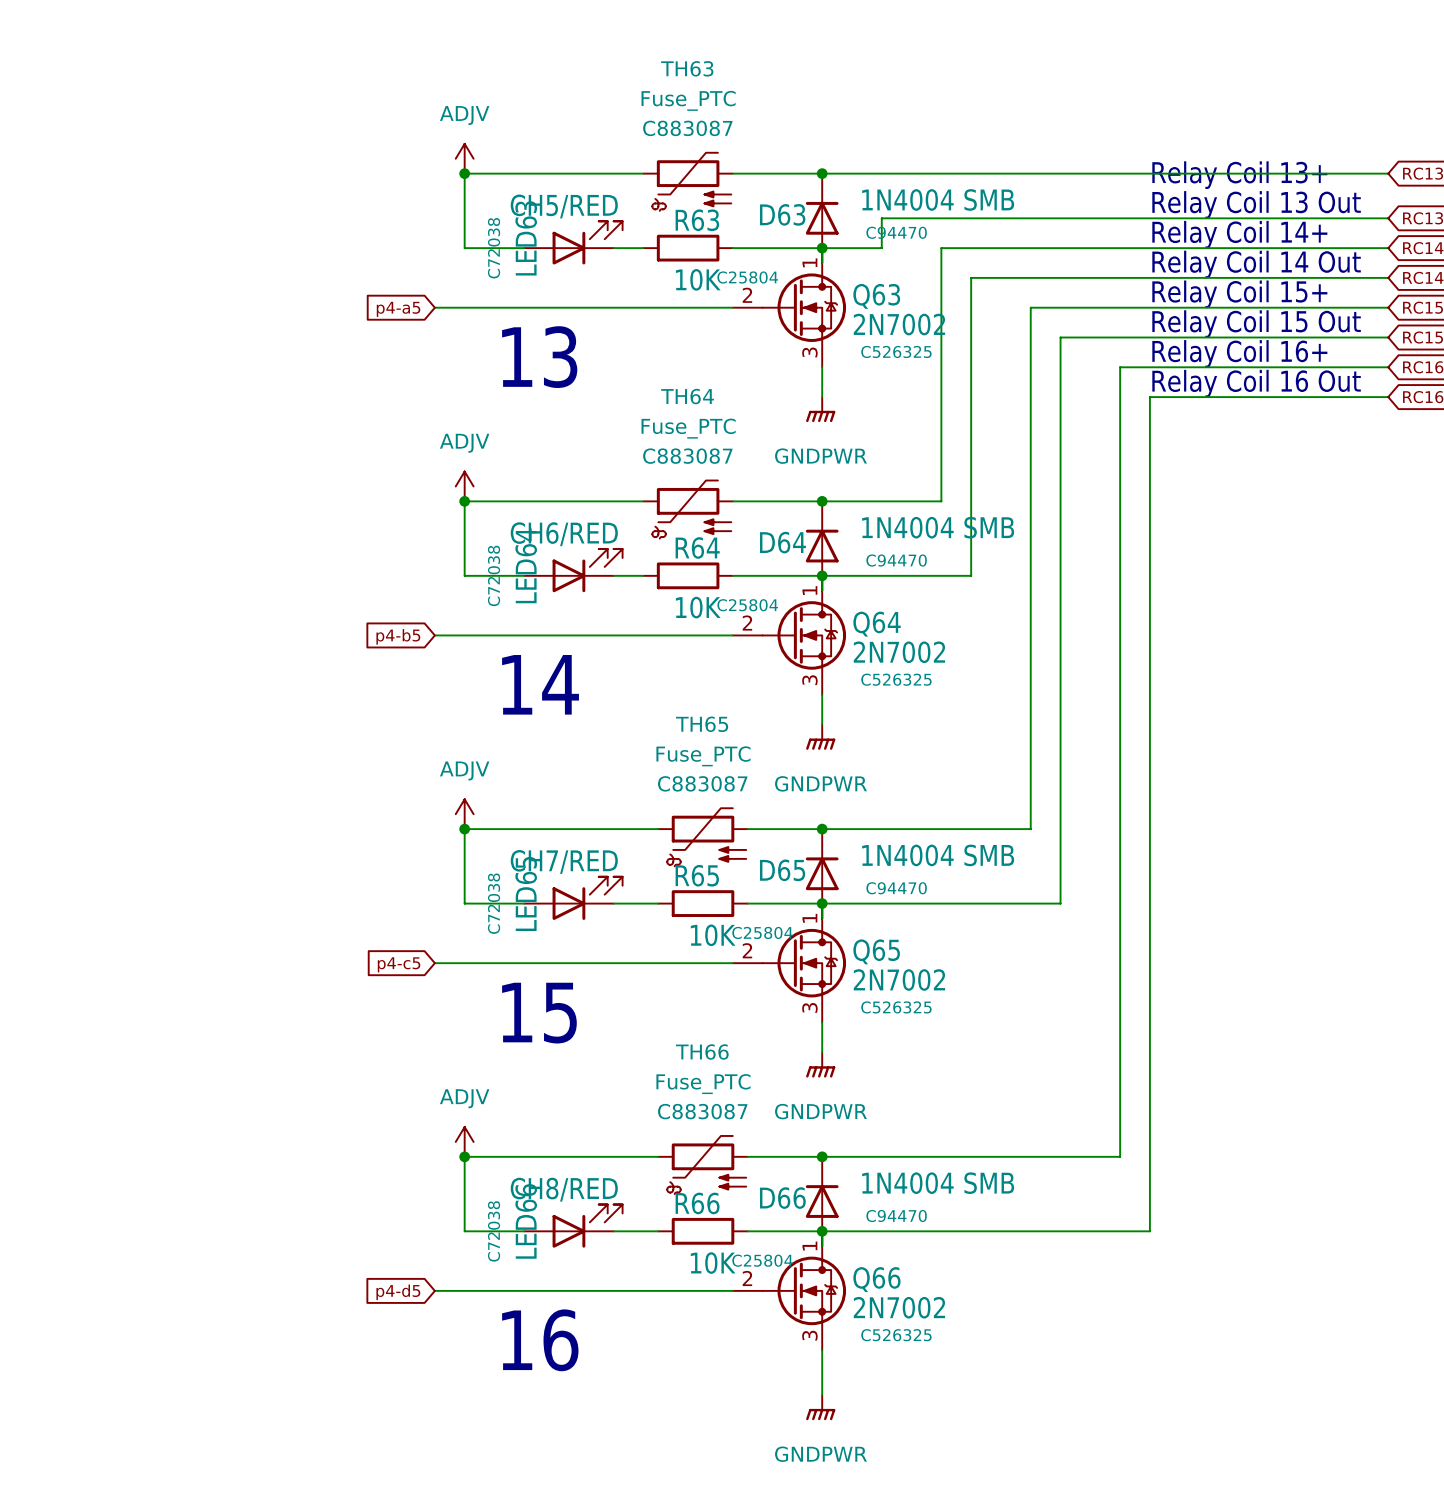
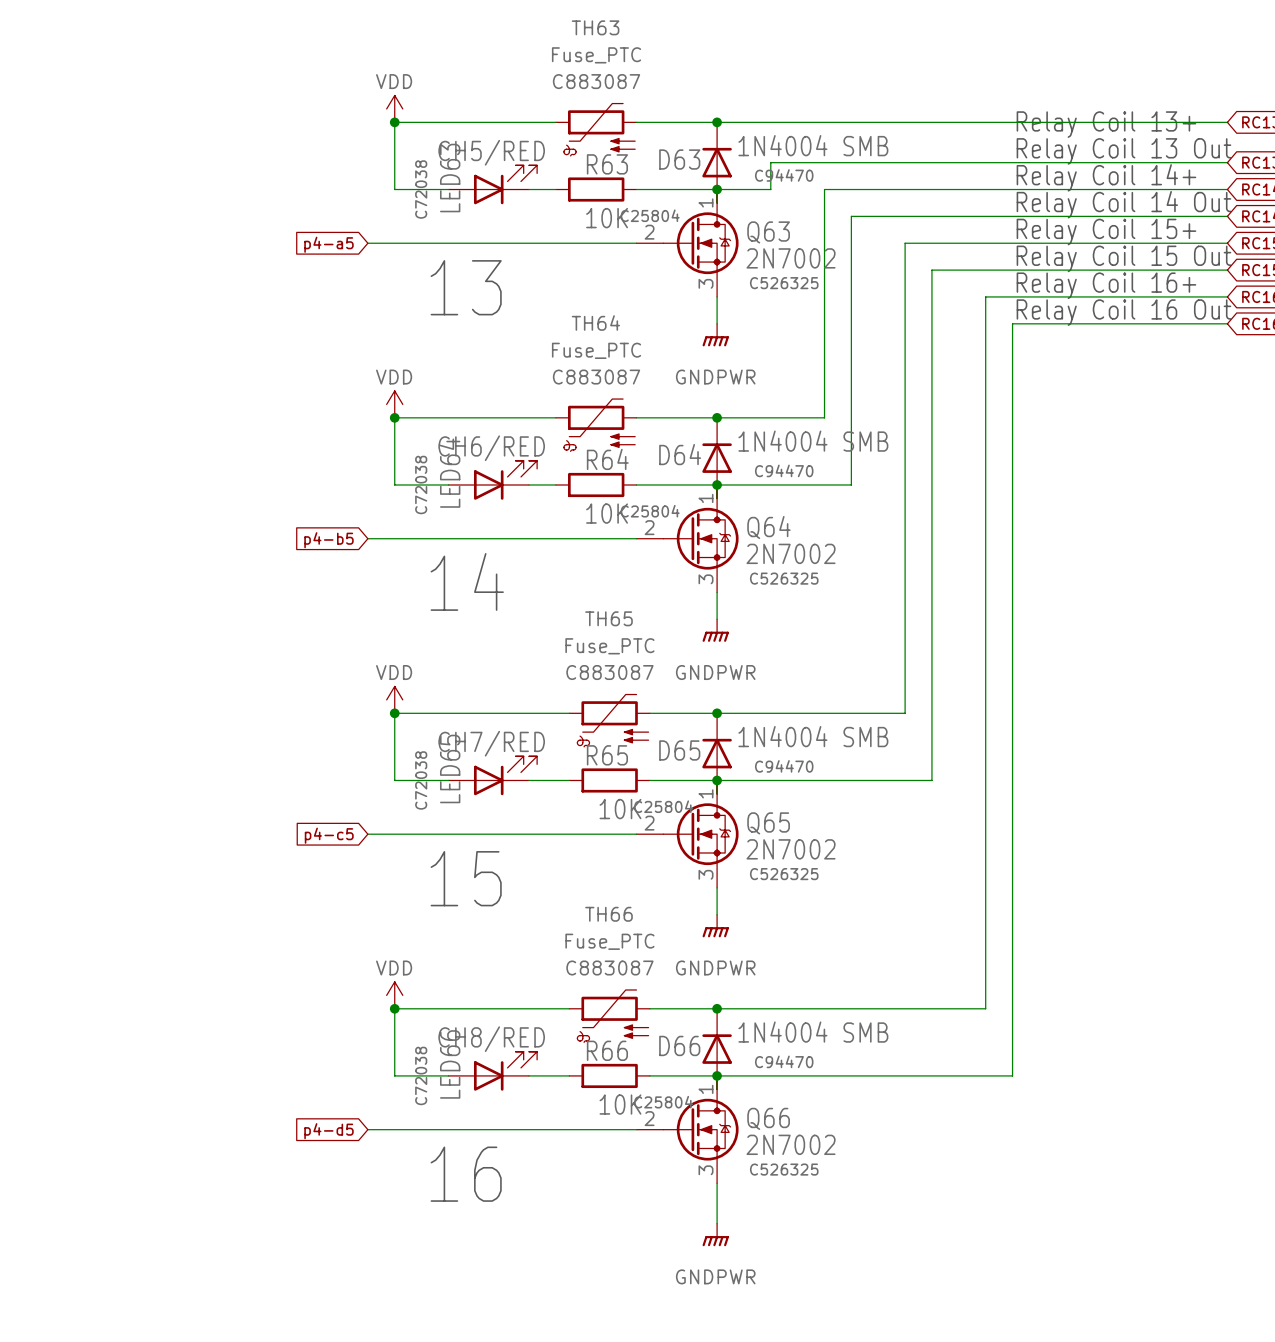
power symbol: ADJV (464, 158) -> VDD (394, 108)
power symbol: ADJV (464, 486) -> VDD (394, 404)
power symbol: ADJV (464, 814) -> VDD (394, 699)
power symbol: ADJV (464, 1141) -> VDD (394, 995)

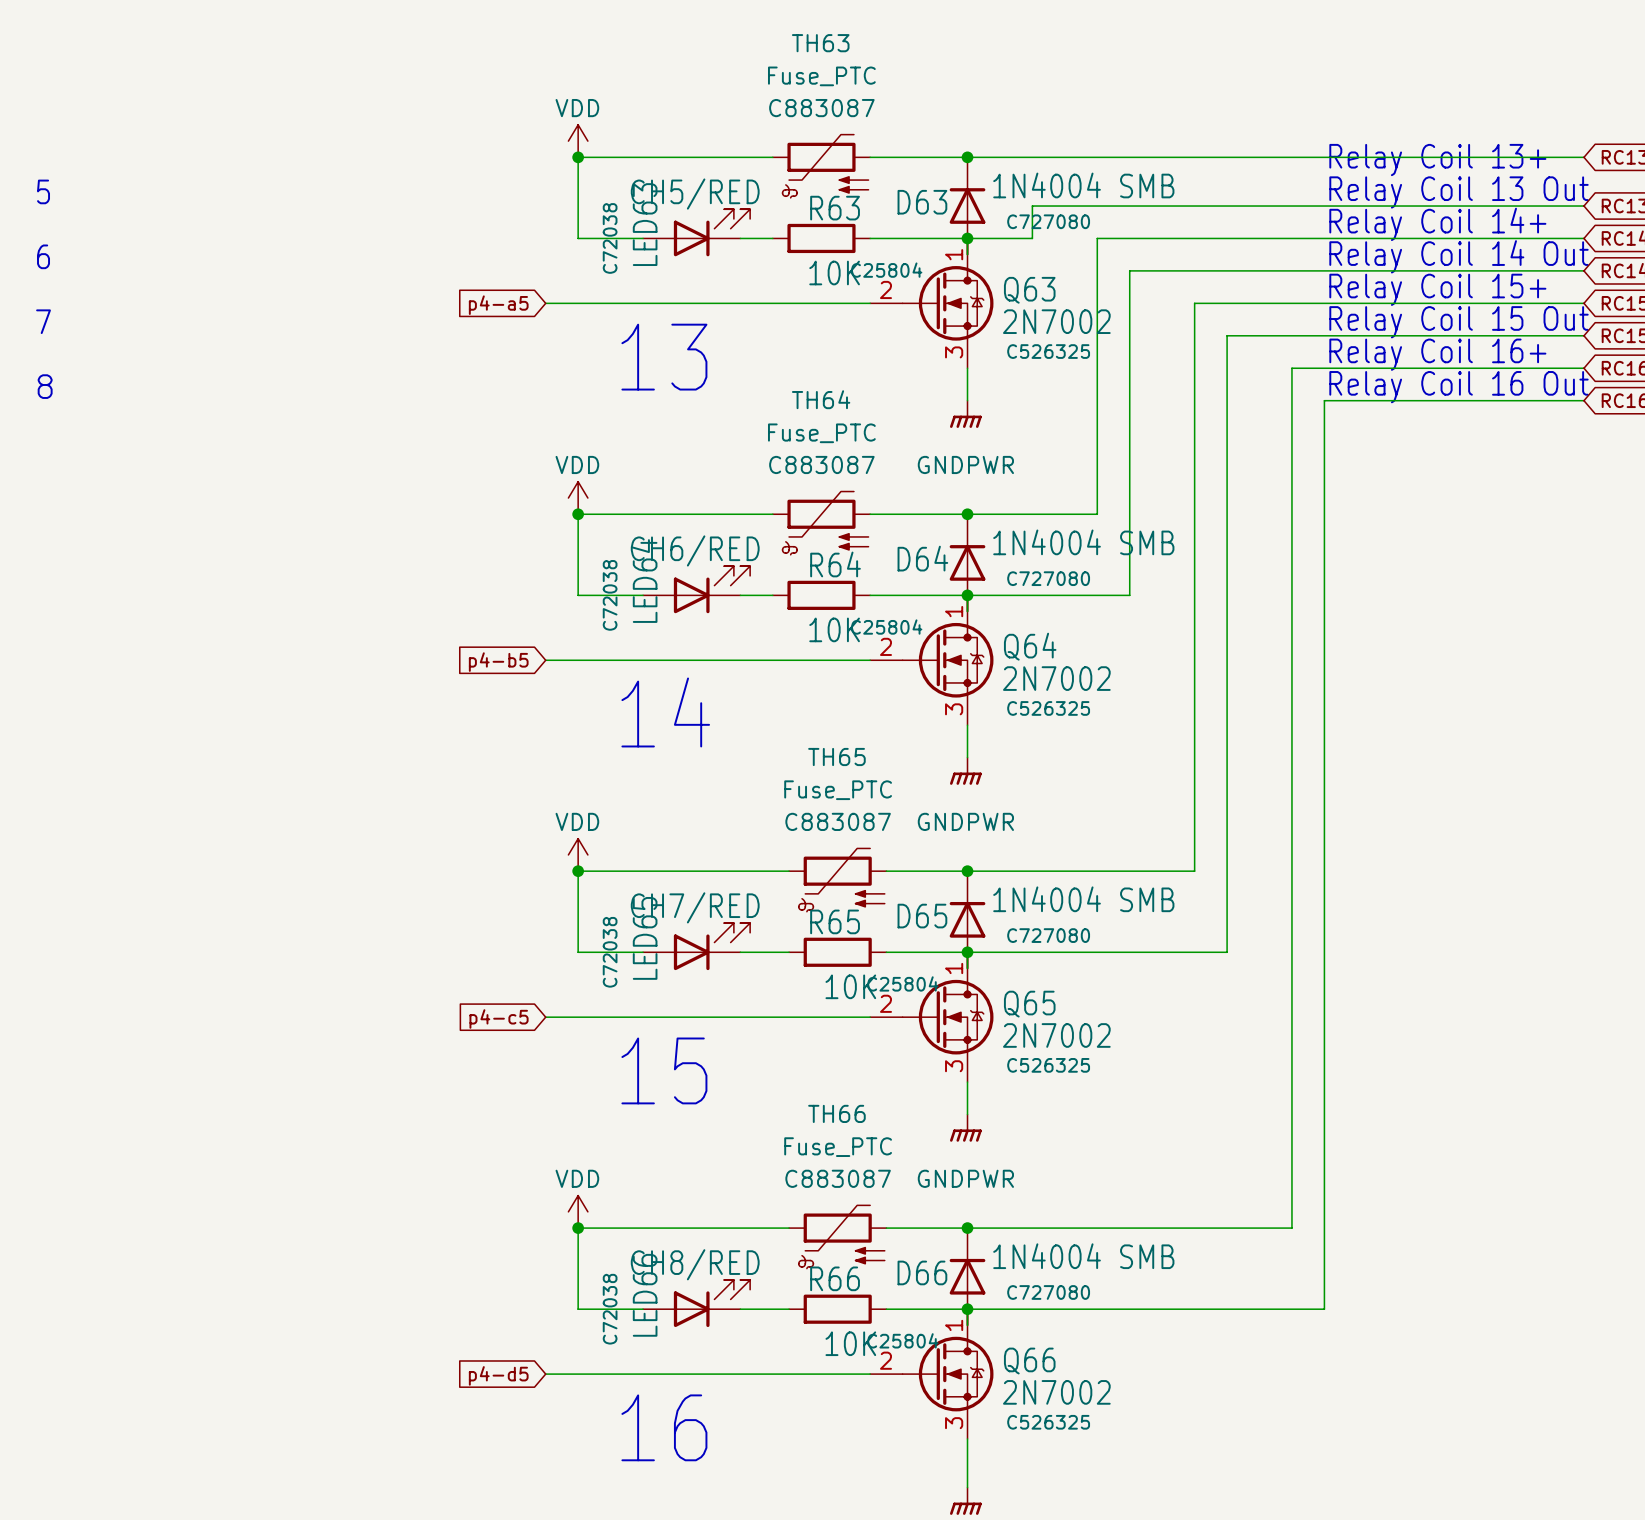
D63 text: C94470 (784, 175) -> C727080 (1048, 221)
D64 text: C94470 (784, 470) -> C727080 (1048, 578)
D65 text: C94470 (784, 766) -> C727080 (1048, 935)
D66 text: C94470 (784, 1061) -> C727080 (1048, 1292)

